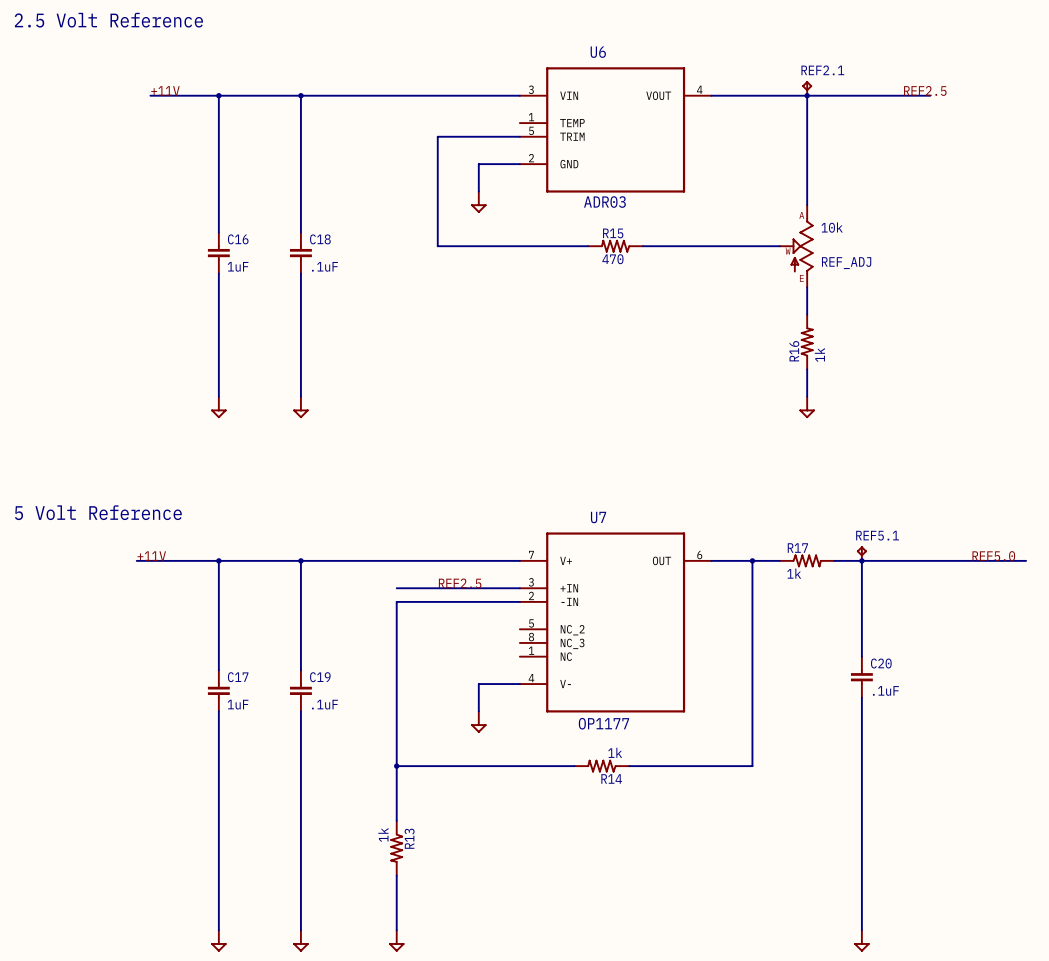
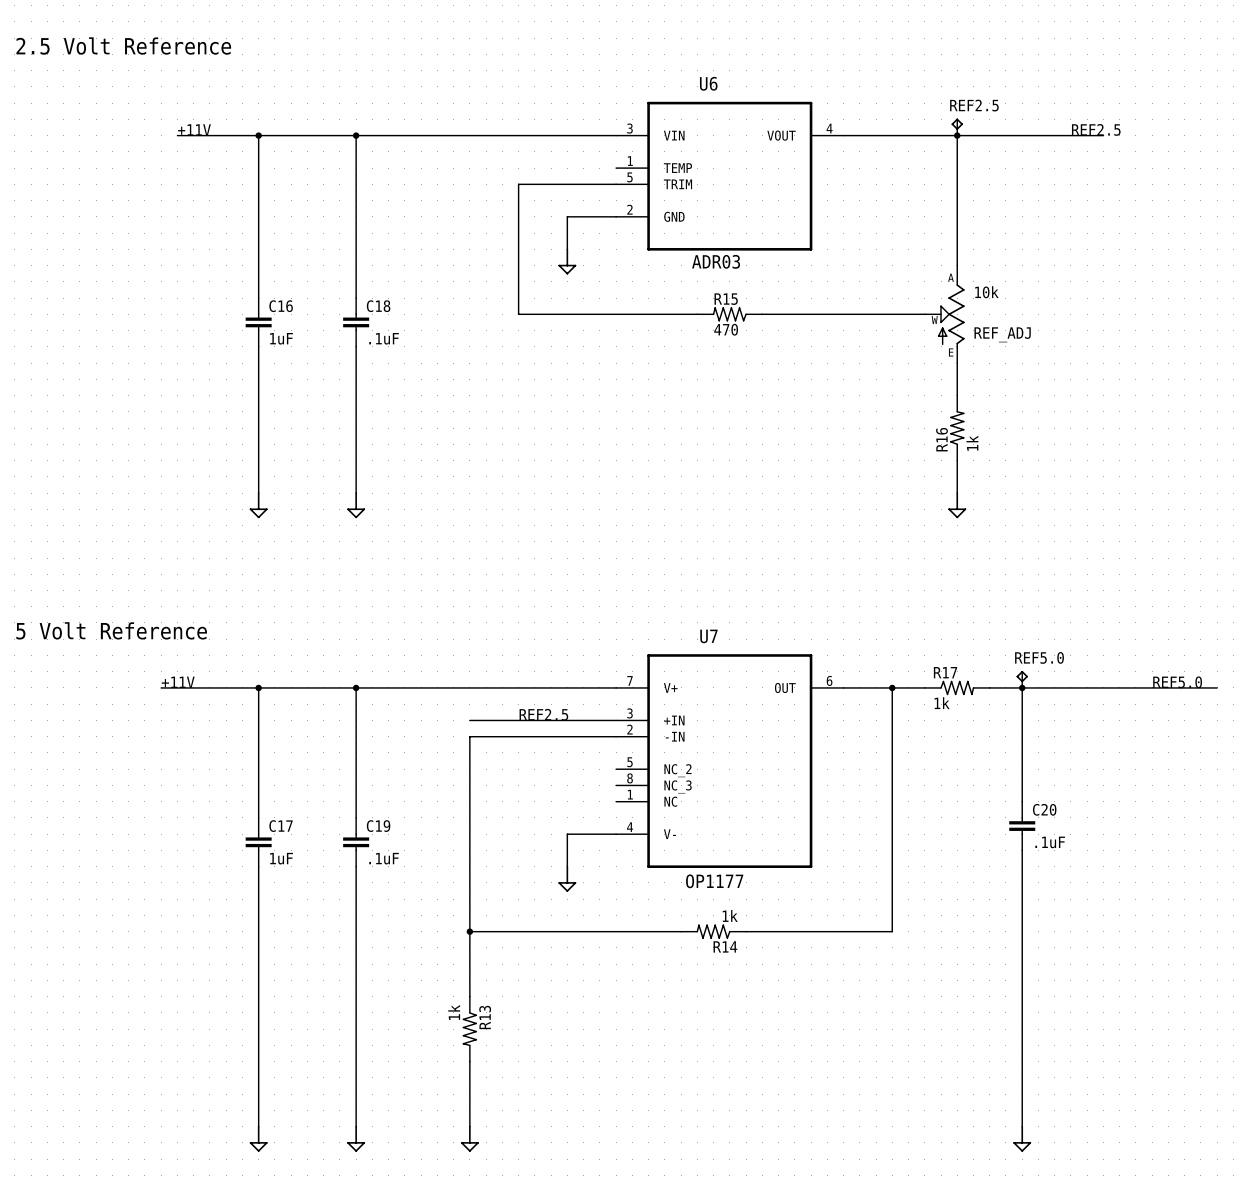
REF2.1 name: REF2.1 (822, 70) -> REF2.5 (974, 105)
REF5.1 name: REF5.1 (877, 535) -> REF5.0 (1039, 657)

